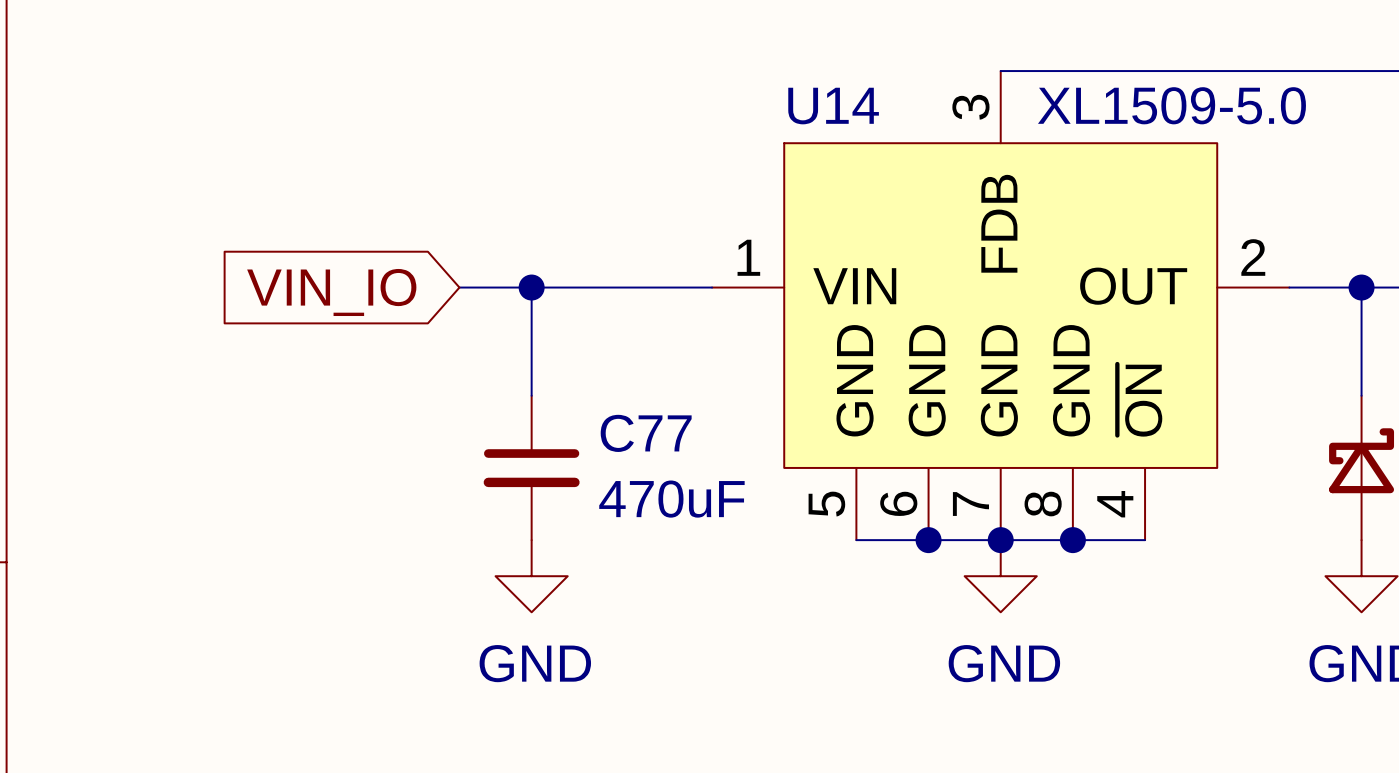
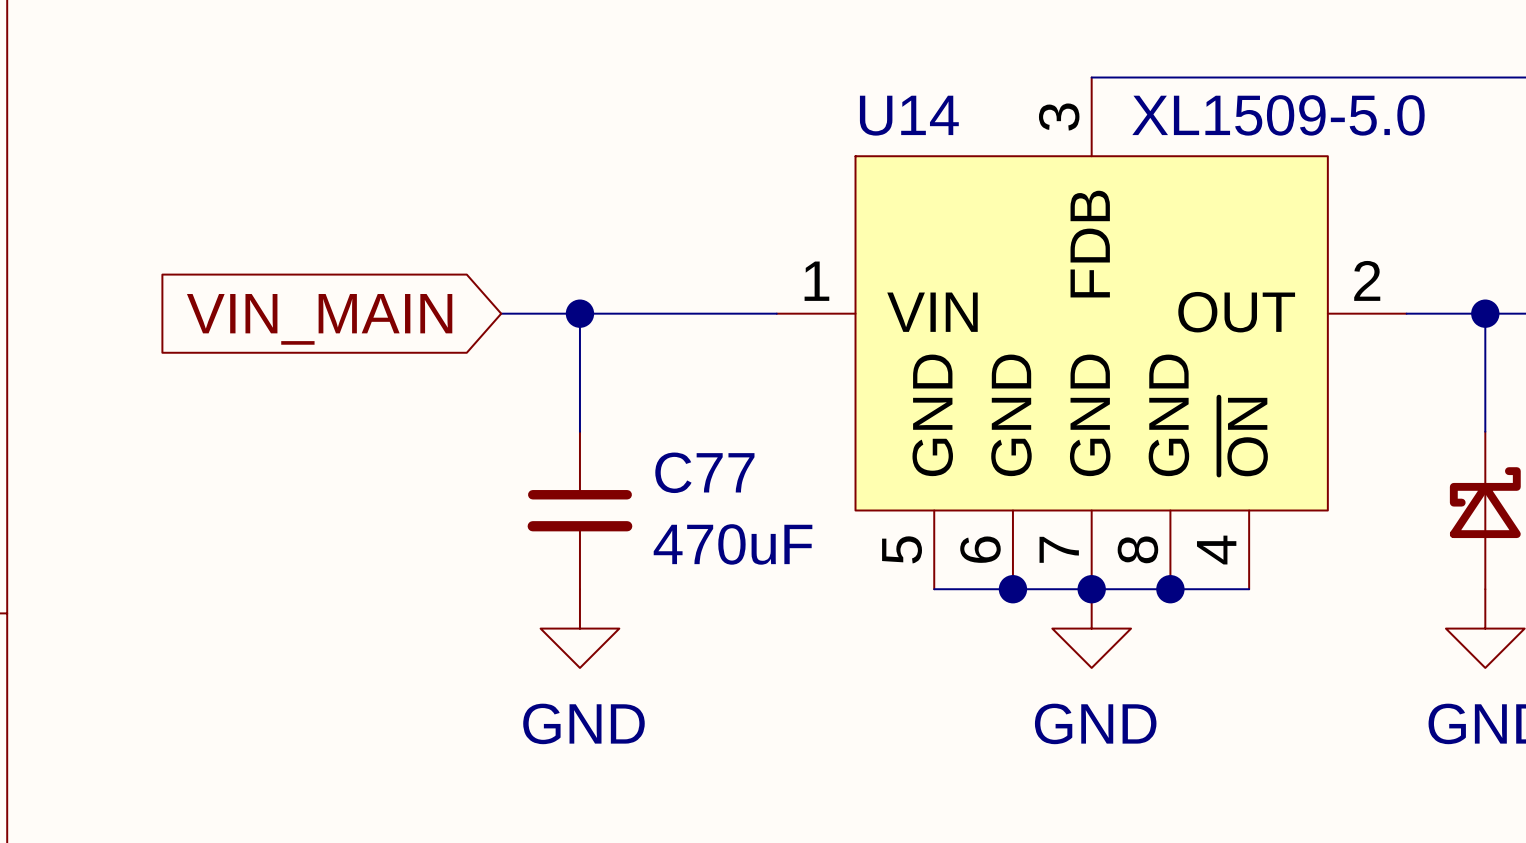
global label: VIN_IO (331, 292) -> VIN_MAIN (319, 319)

